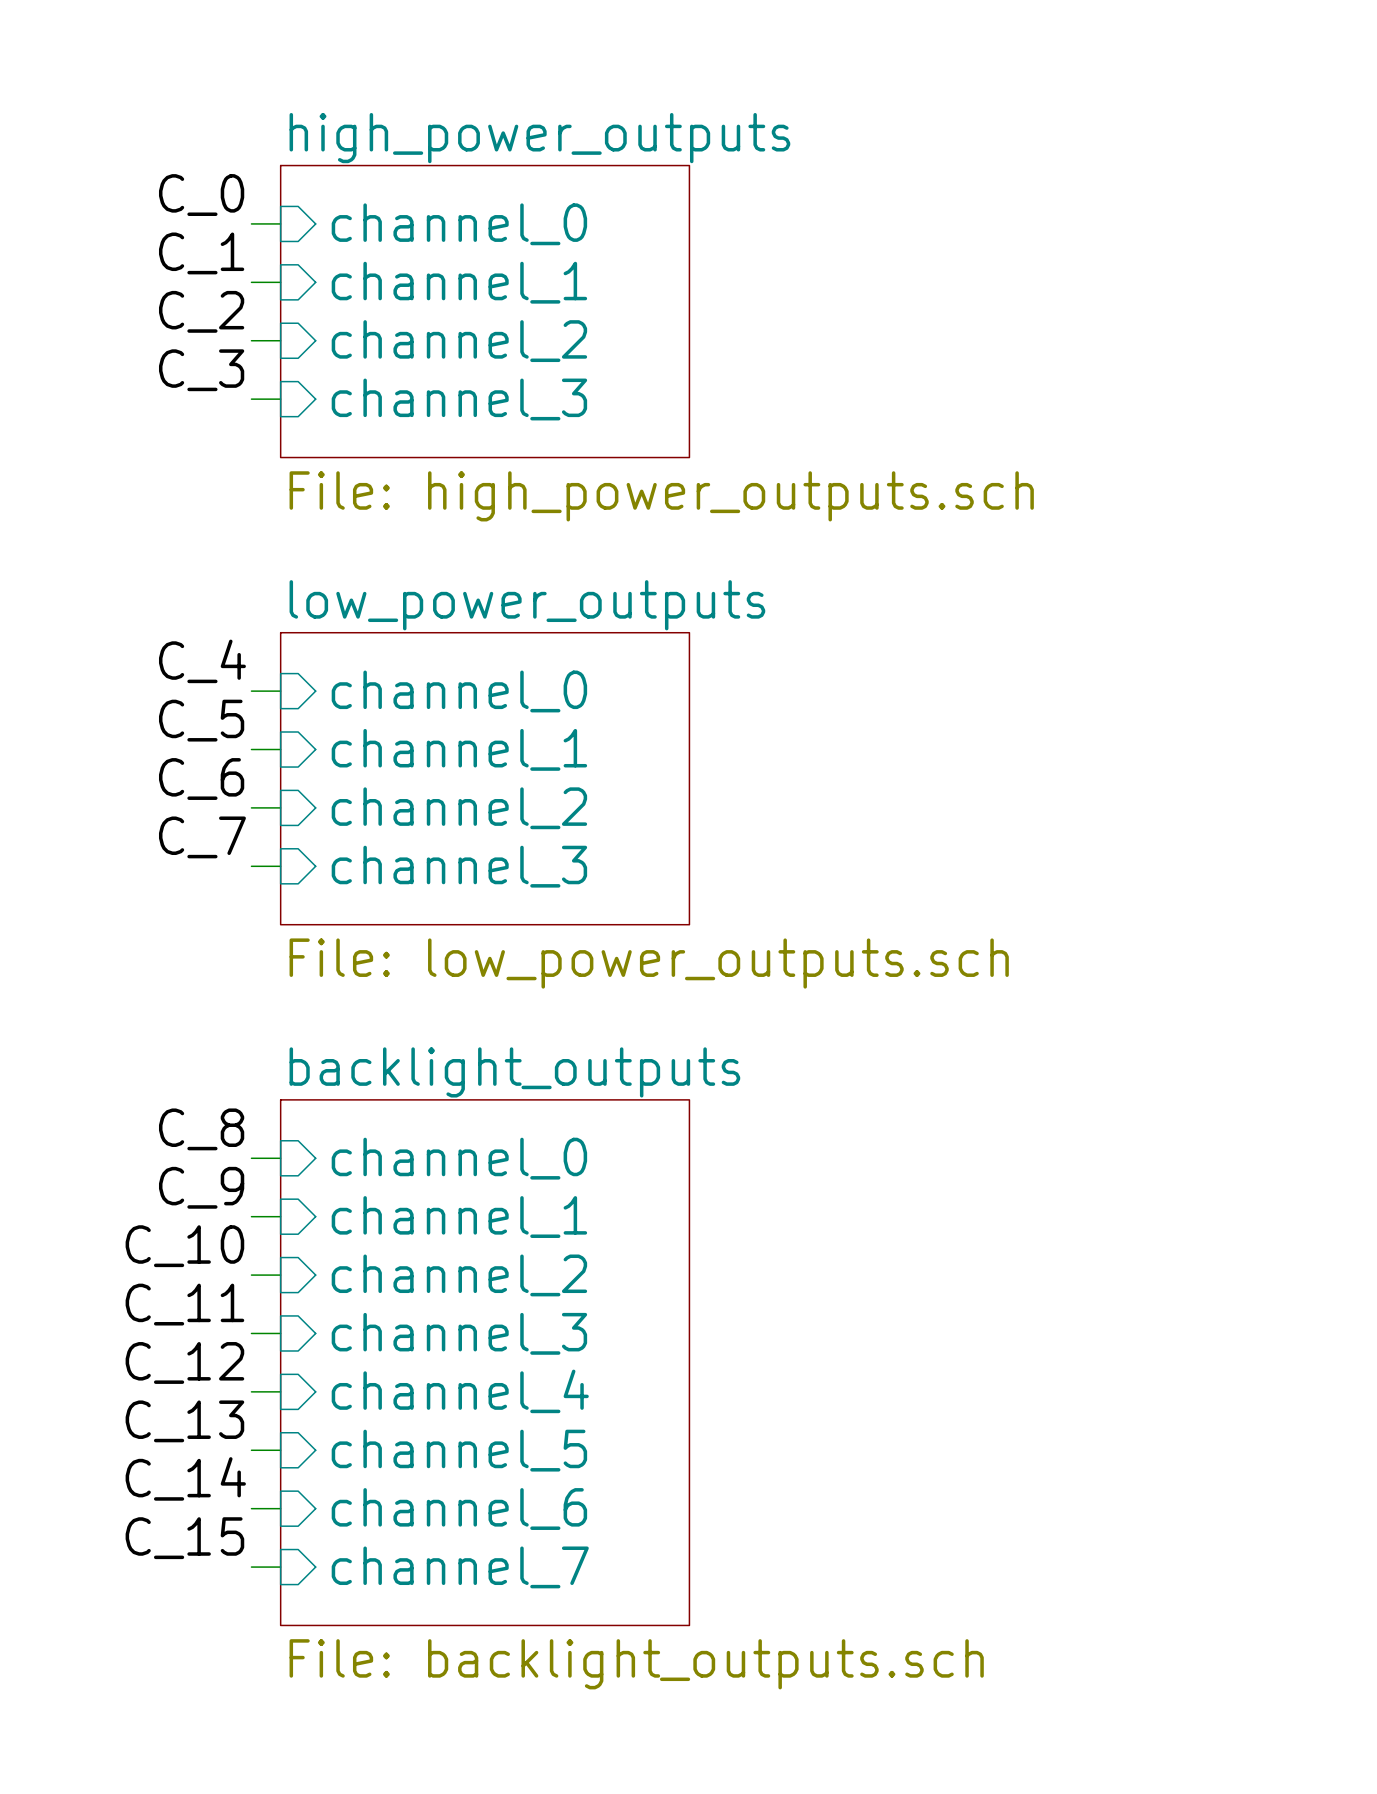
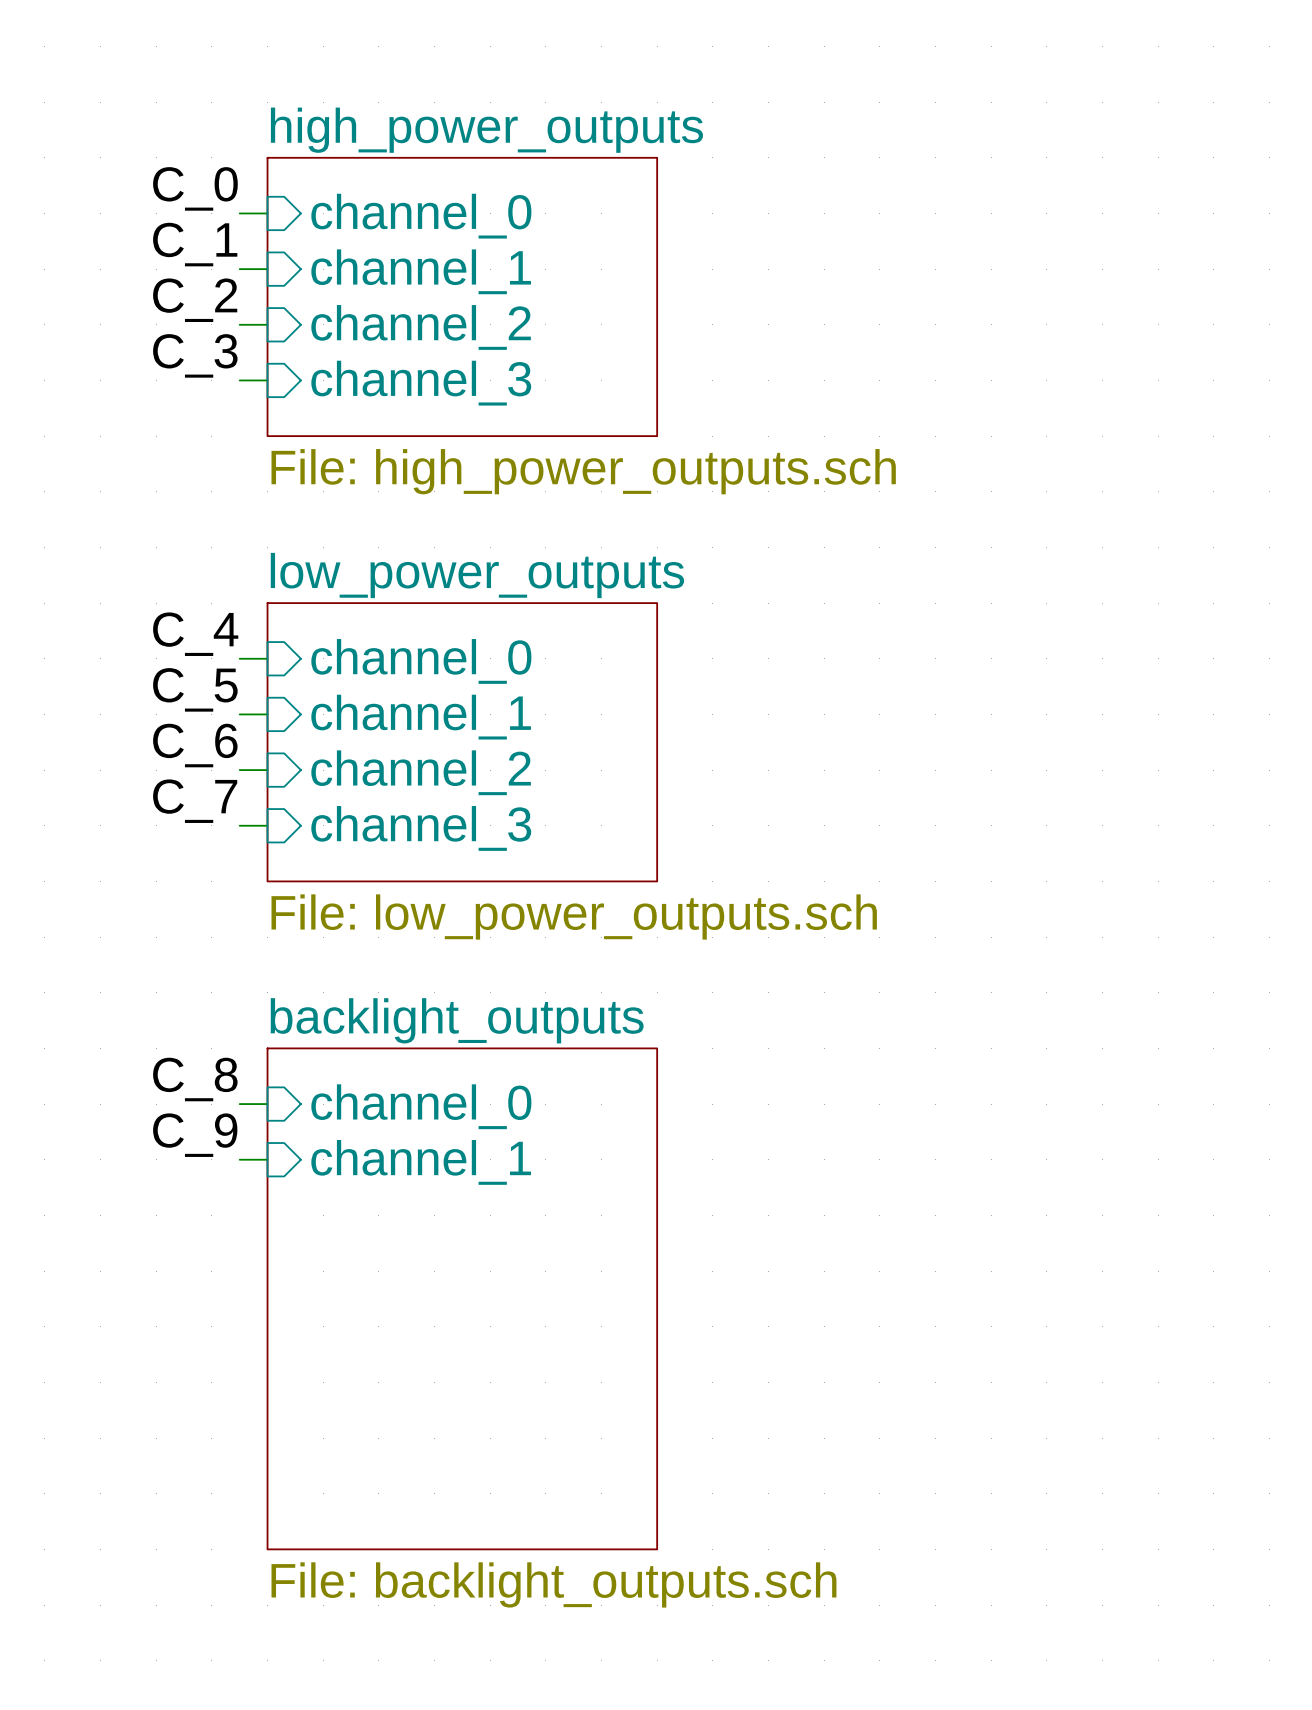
label: C_10 (184, 1246) -> none
wire: (251, 1275) (280, 1275) -> none
sheet pin: channel_2 (459, 1275) -> none
label: C_11 (184, 1304) -> none
wire: (251, 1333) (280, 1333) -> none
sheet pin: channel_3 (459, 1333) -> none
label: C_12 (184, 1362) -> none
wire: (251, 1391) (280, 1391) -> none
sheet pin: channel_4 (460, 1391) -> none
label: C_13 (184, 1421) -> none
wire: (251, 1450) (280, 1450) -> none
sheet pin: channel_5 (459, 1450) -> none
label: C_14 (185, 1478) -> none
wire: (251, 1508) (280, 1508) -> none
sheet pin: channel_6 (459, 1509) -> none
label: C_15 (184, 1538) -> none
wire: (251, 1567) (280, 1567) -> none
sheet pin: channel_7 (460, 1567) -> none

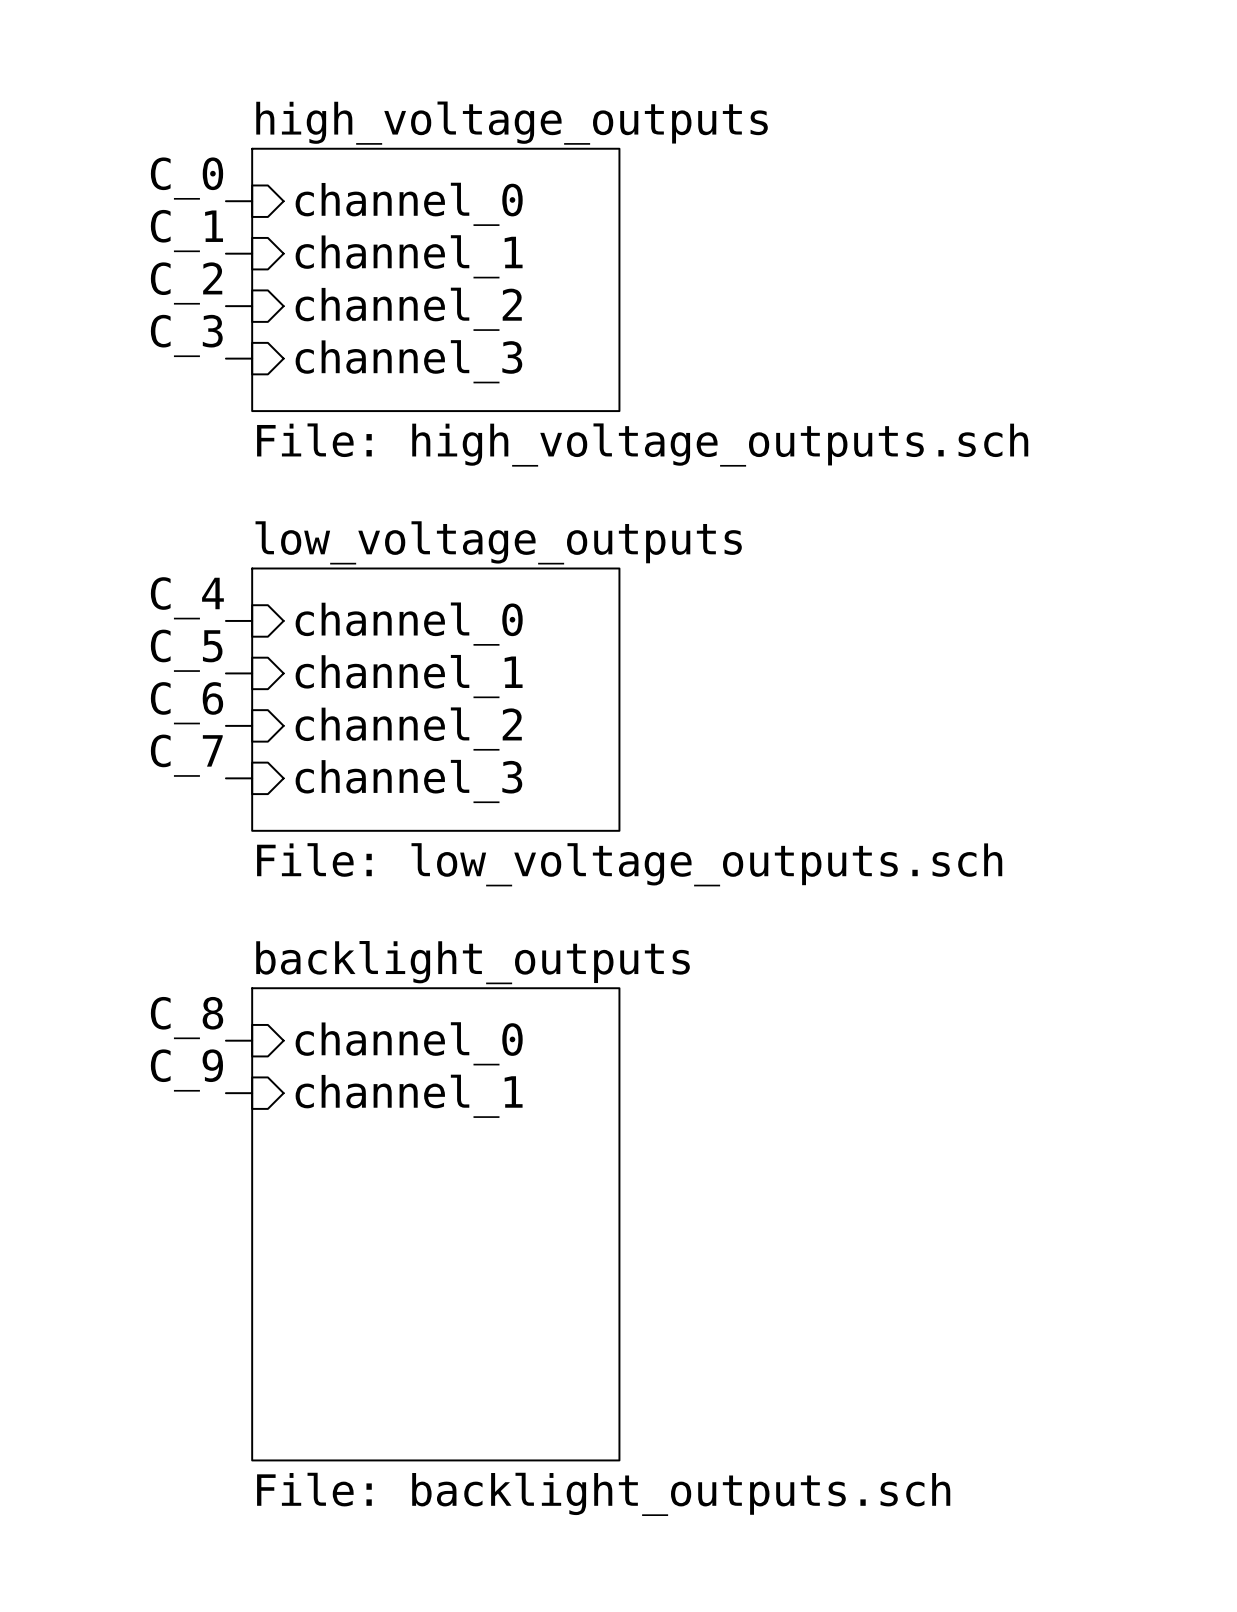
sheet high_power_outputs name: high_power_outputs (486, 130) -> high_voltage_outputs (512, 123)
sheet high_power_outputs value: File: high_power_outputs.sch (583, 471) -> File: high_voltage_outputs.sch (642, 445)
sheet low_power_outputs name: low_power_outputs (477, 575) -> low_voltage_outputs (498, 542)
sheet low_power_outputs value: File: low_power_outputs.sch (574, 916) -> File: low_voltage_outputs.sch (629, 864)

